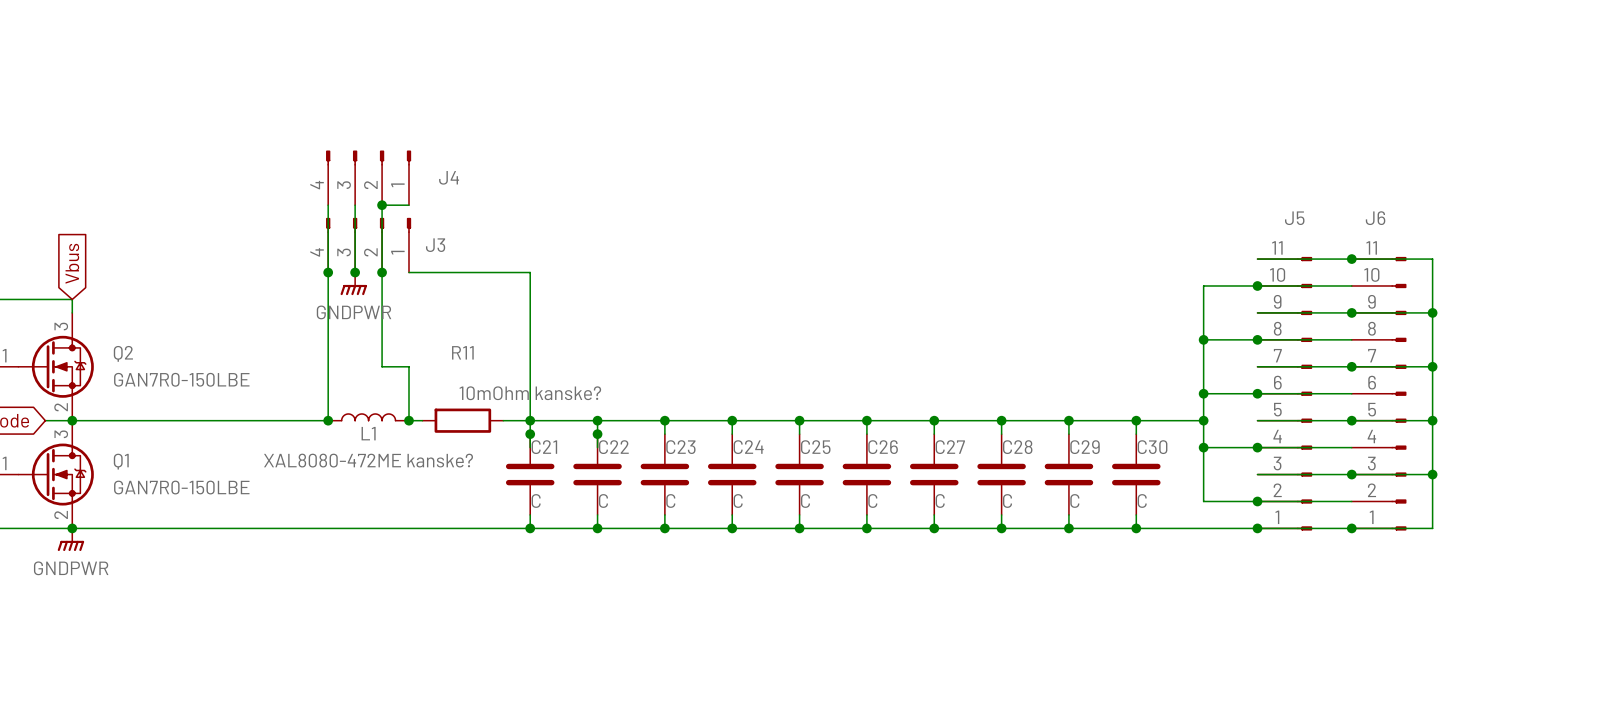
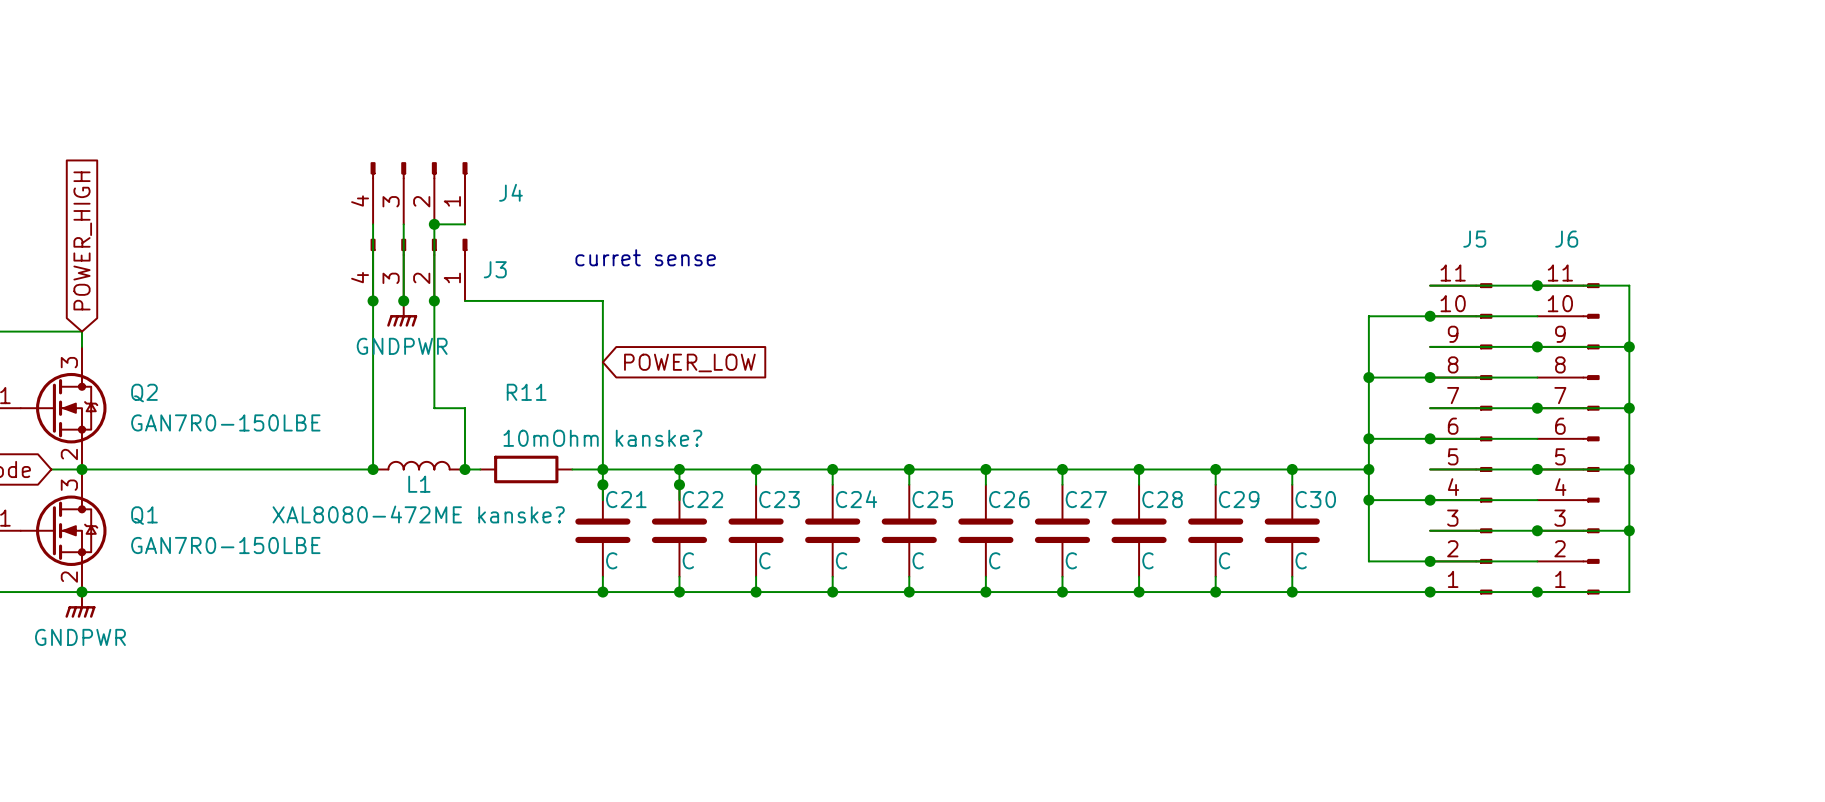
text: none -> curret sense (645, 257)
global label: Vbus (72, 263) -> POWER_HIGH (82, 240)
global label: none -> POWER_LOW (689, 362)

